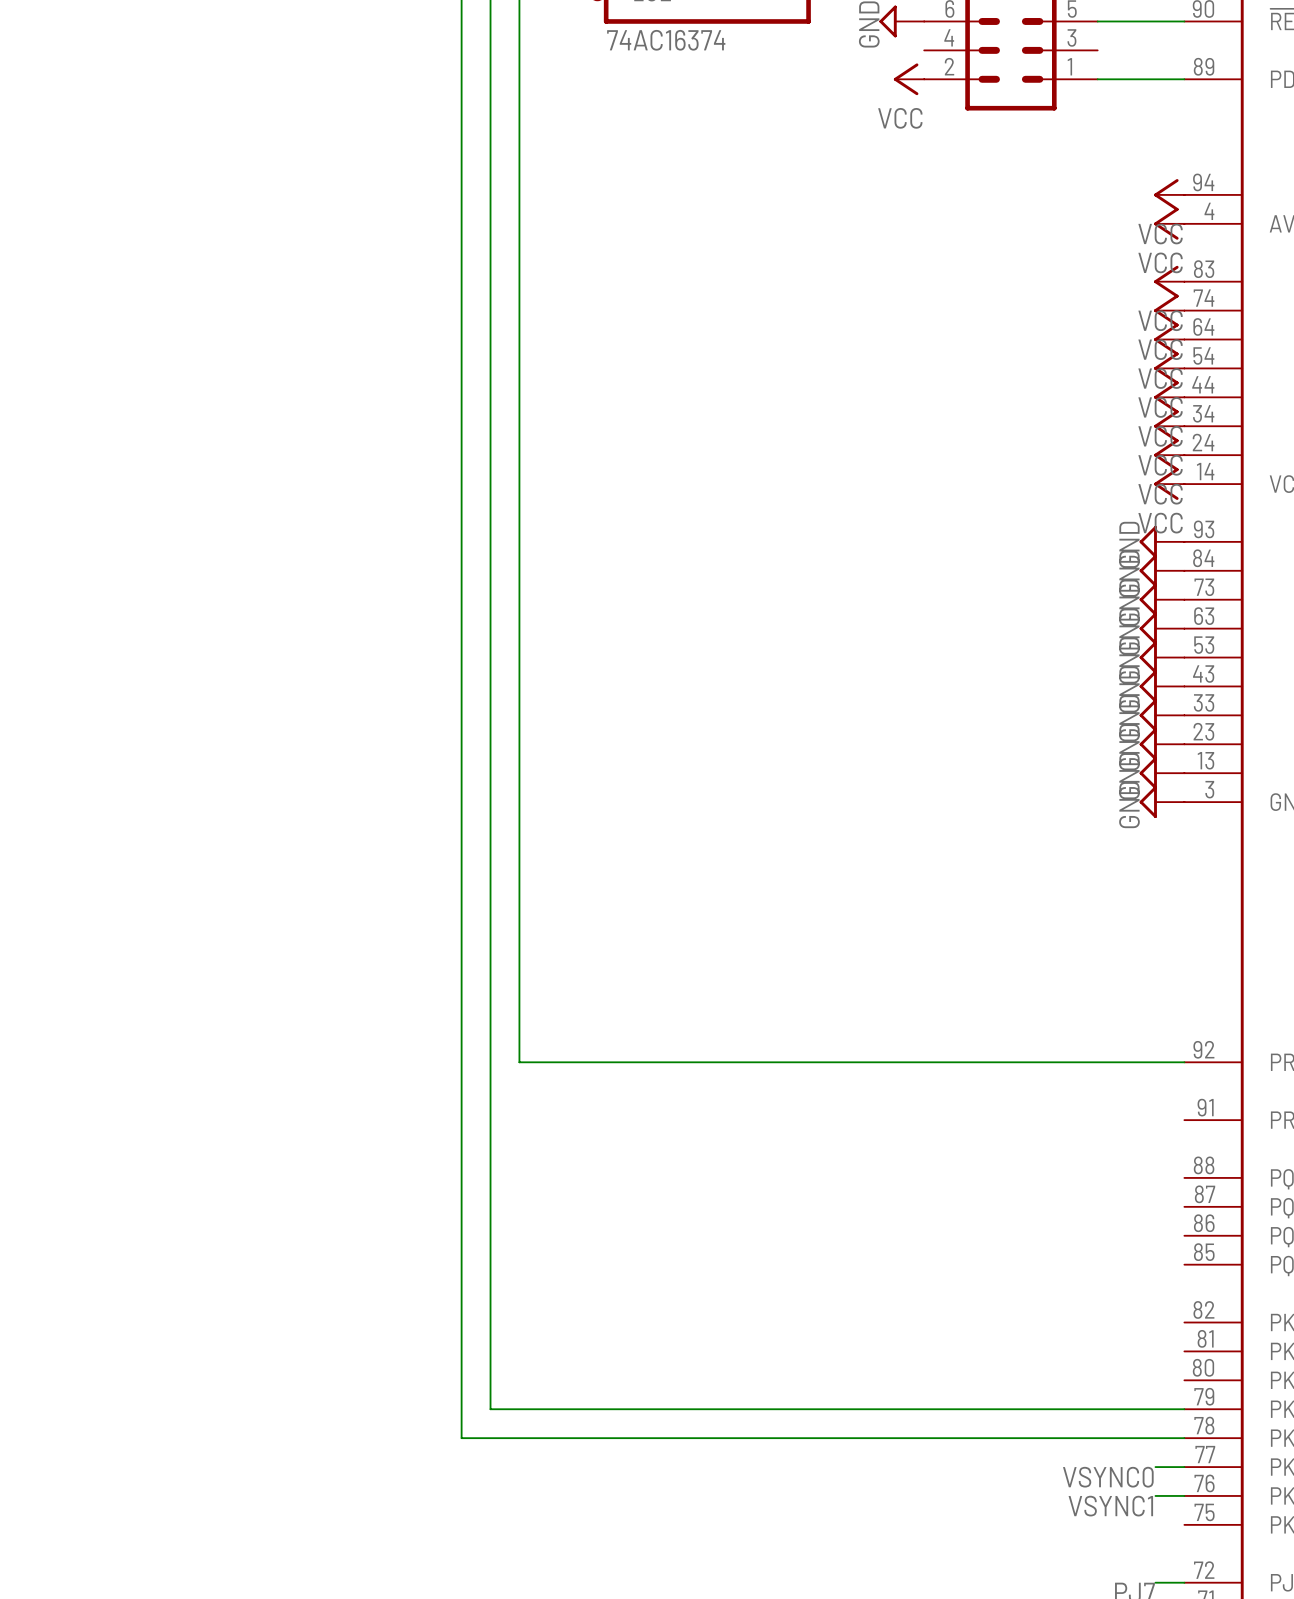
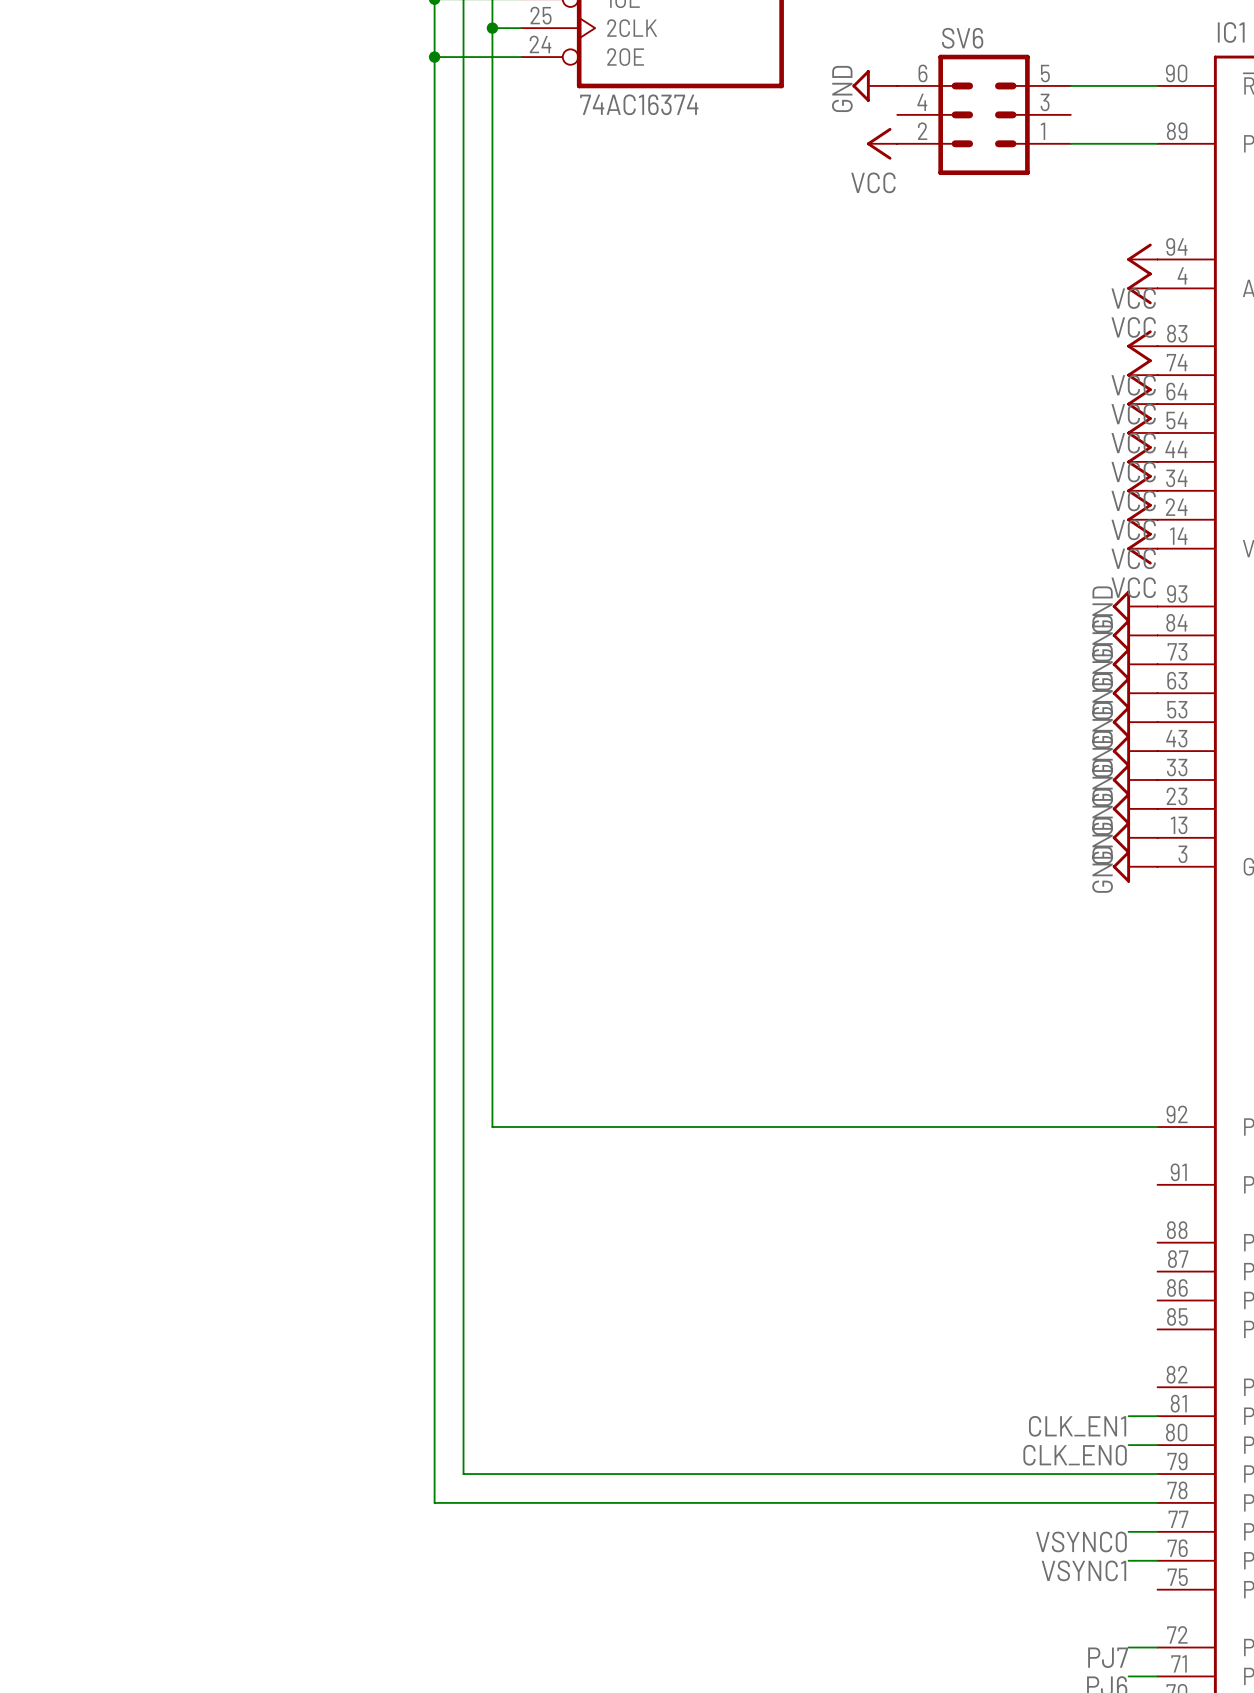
wire: none -> (1128, 1416) (1157, 1416)
label: none -> CLK_EN1 (1077, 1426)
wire: none -> (1128, 1445) (1157, 1445)
label: none -> CLK_EN0 (1075, 1455)

